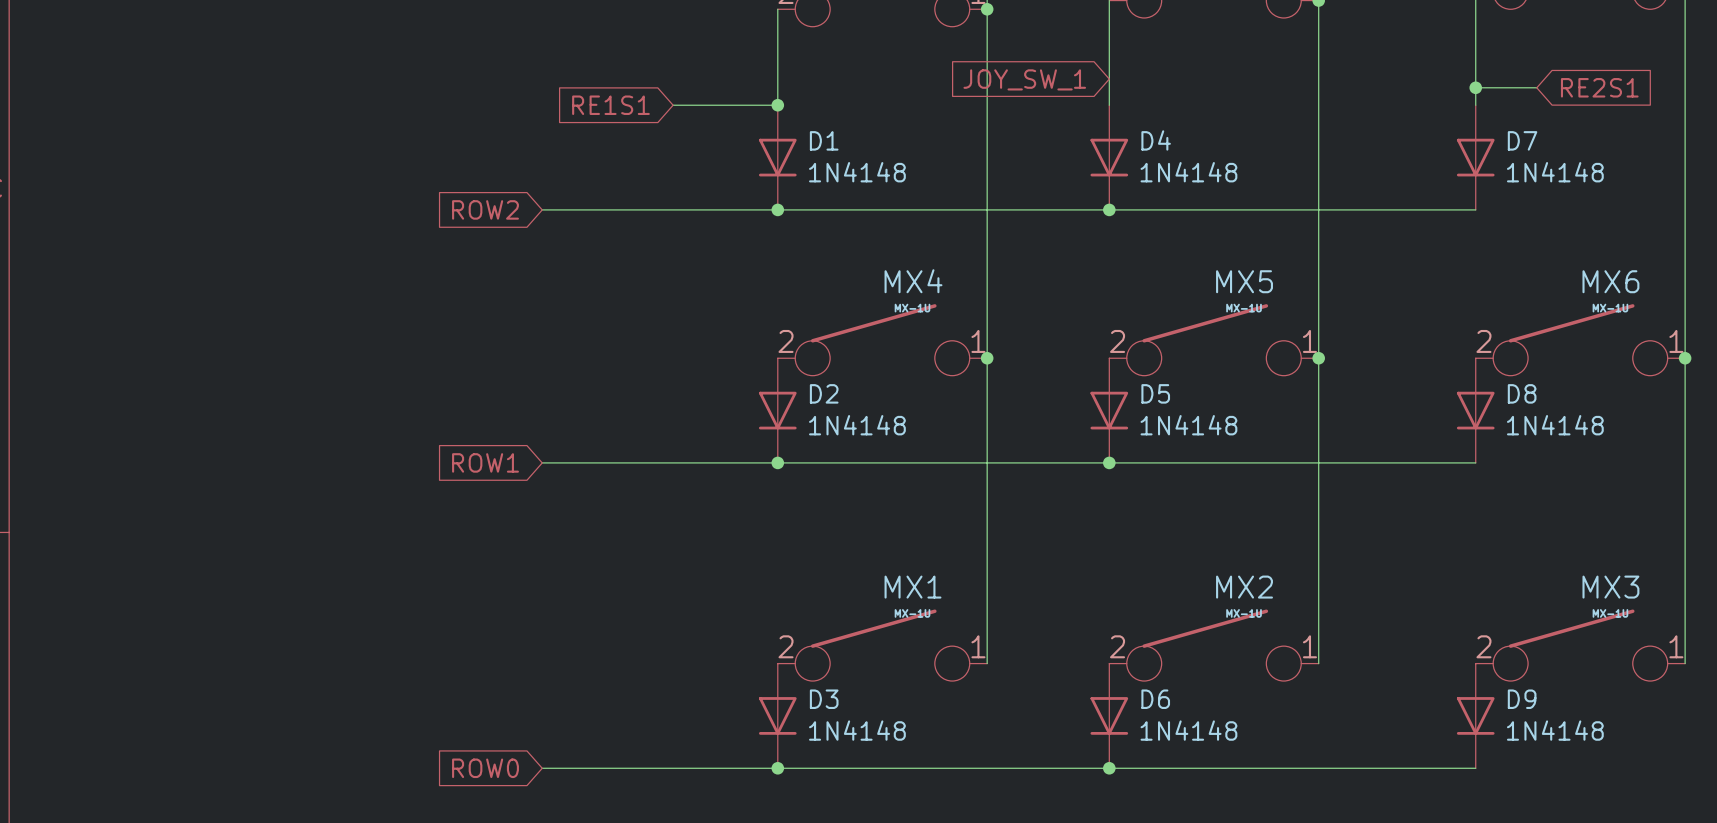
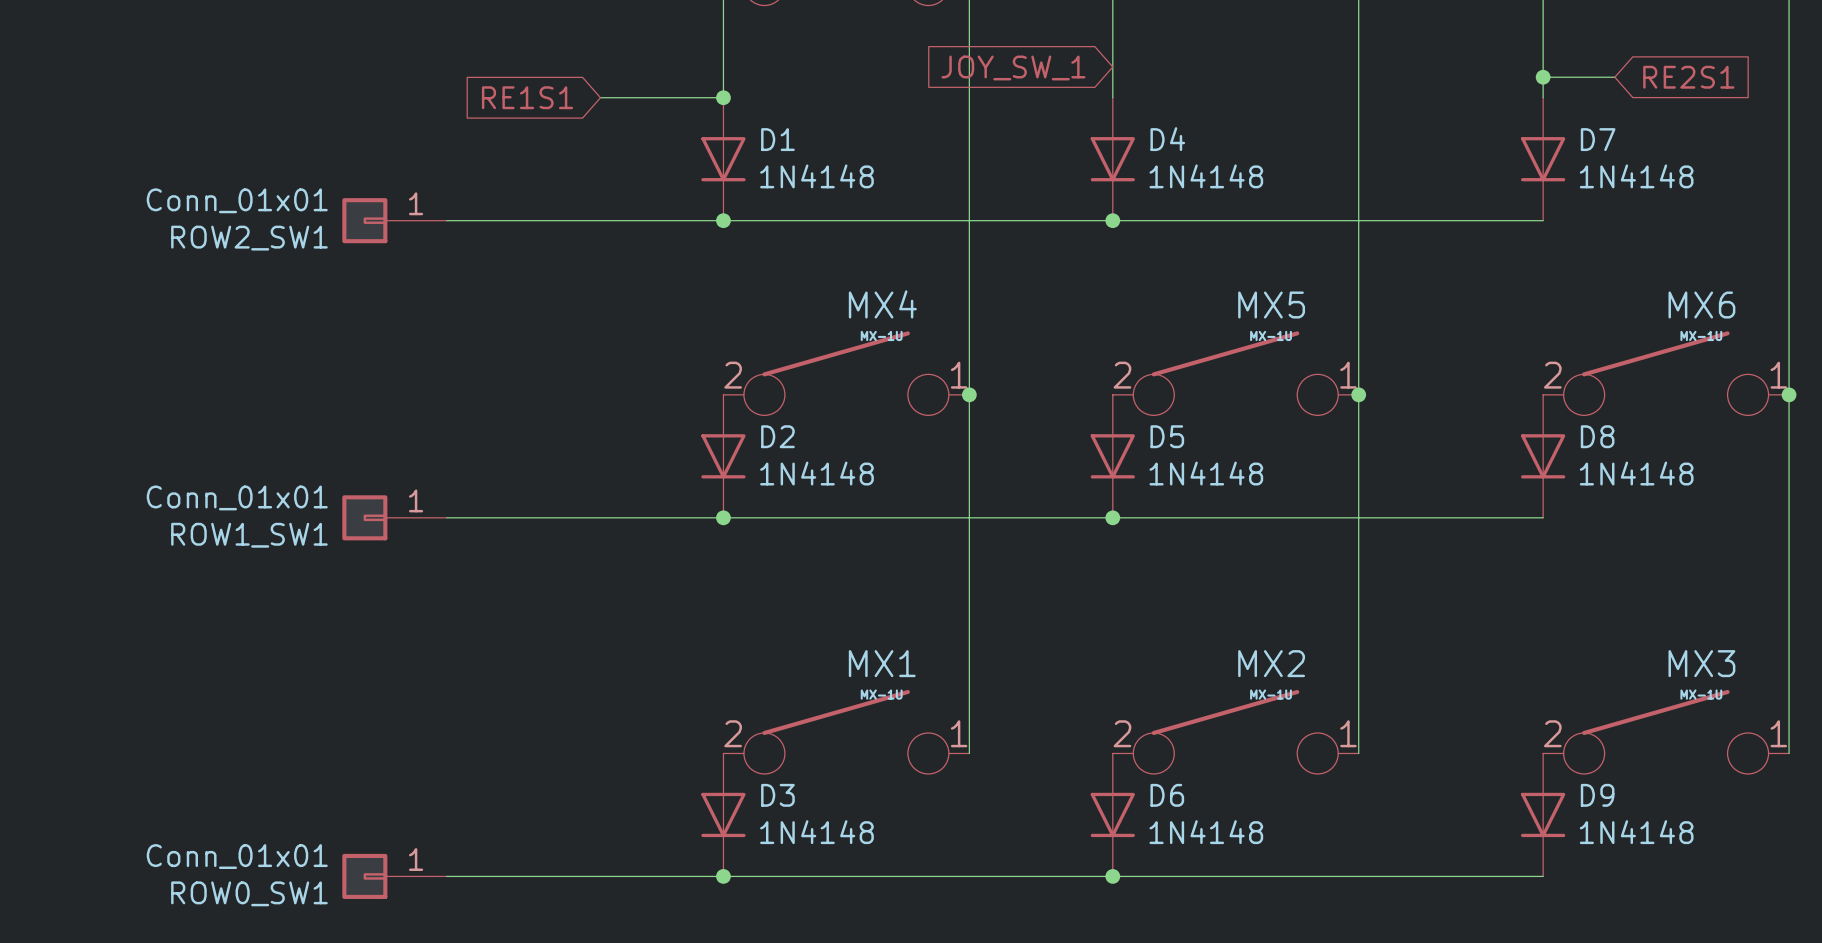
global label: ROW2 (485, 209) -> none
ROW2_SW1: none -> Conn_01x01 (394, 220)
global label: ROW1 (485, 462) -> none
ROW1_SW1: none -> Conn_01x01 (394, 517)
global label: ROW0 (485, 768) -> none
ROW0_SW1: none -> Conn_01x01 (394, 876)

